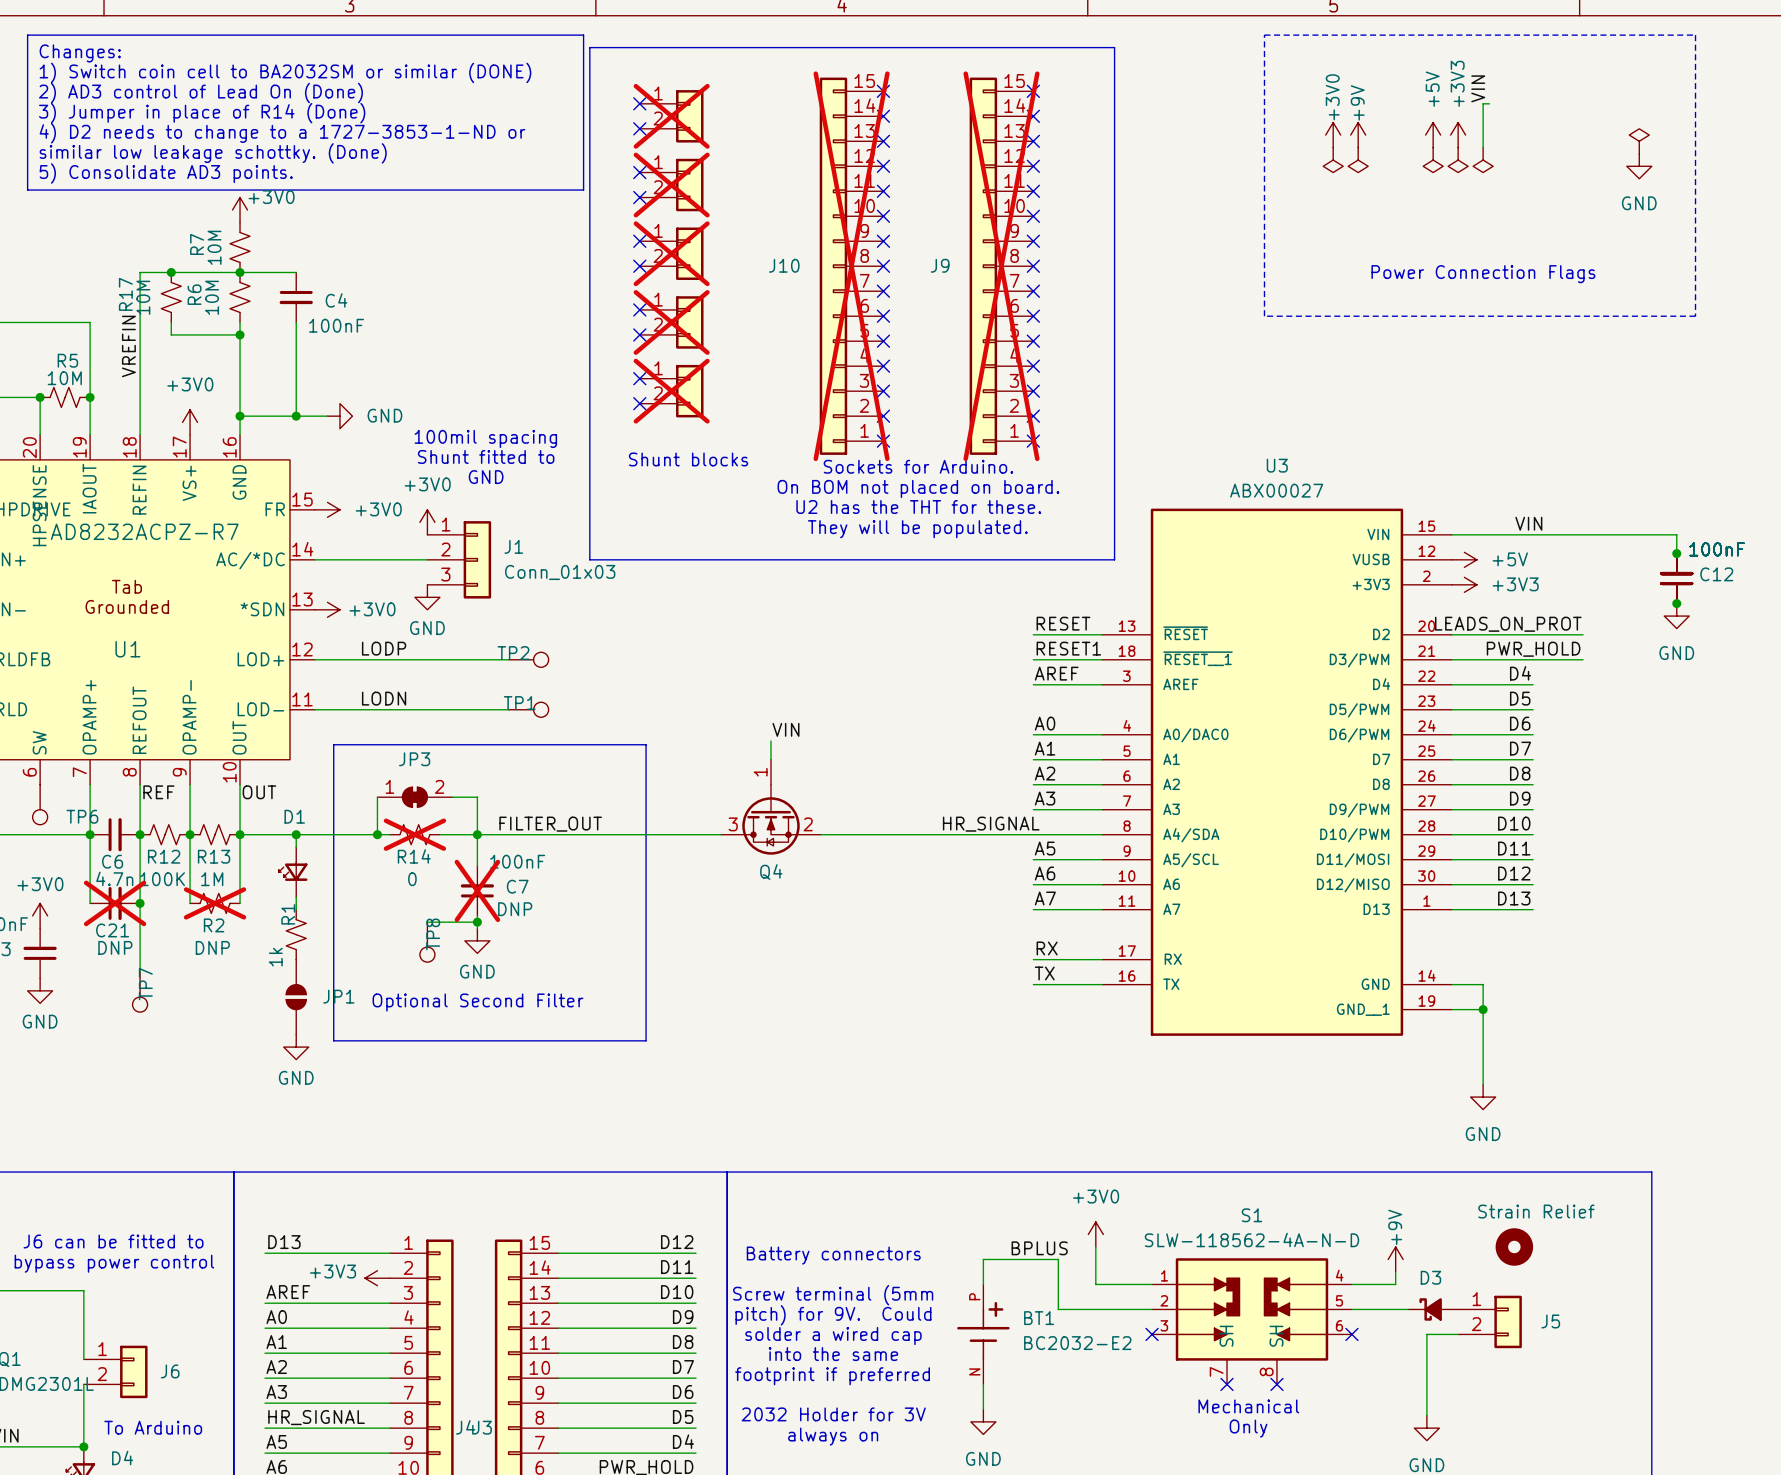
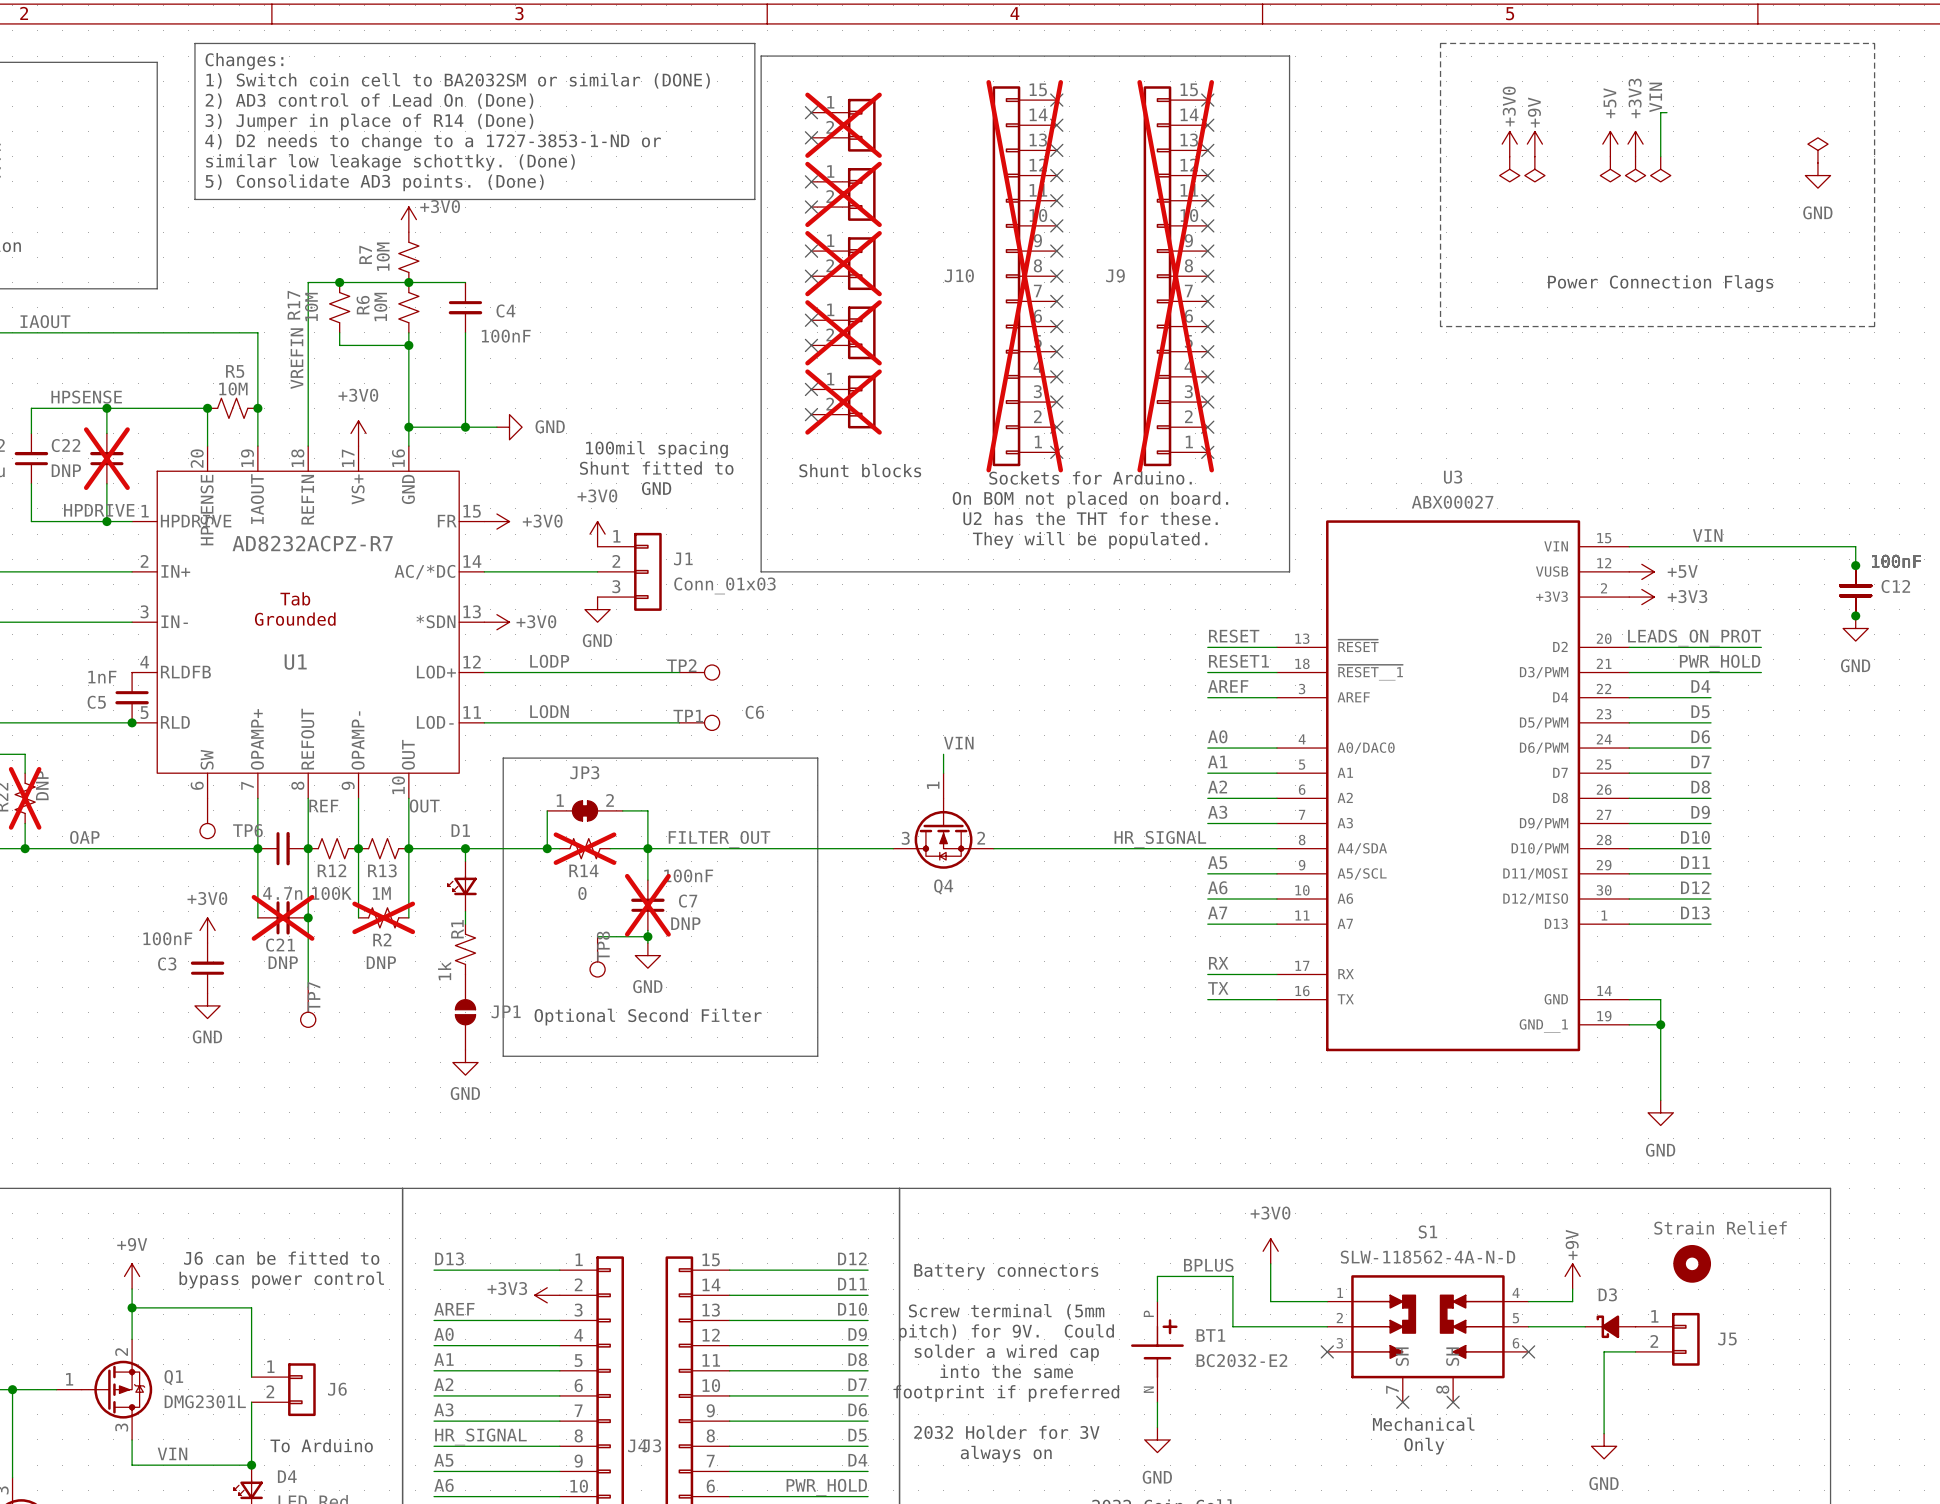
text: 5) Consolidate AD3 points. (166, 173) -> 5) Consolidate AD3 points. (Done) (374, 182)
C6 name position: C6 (112, 861) -> C6 (754, 712)

